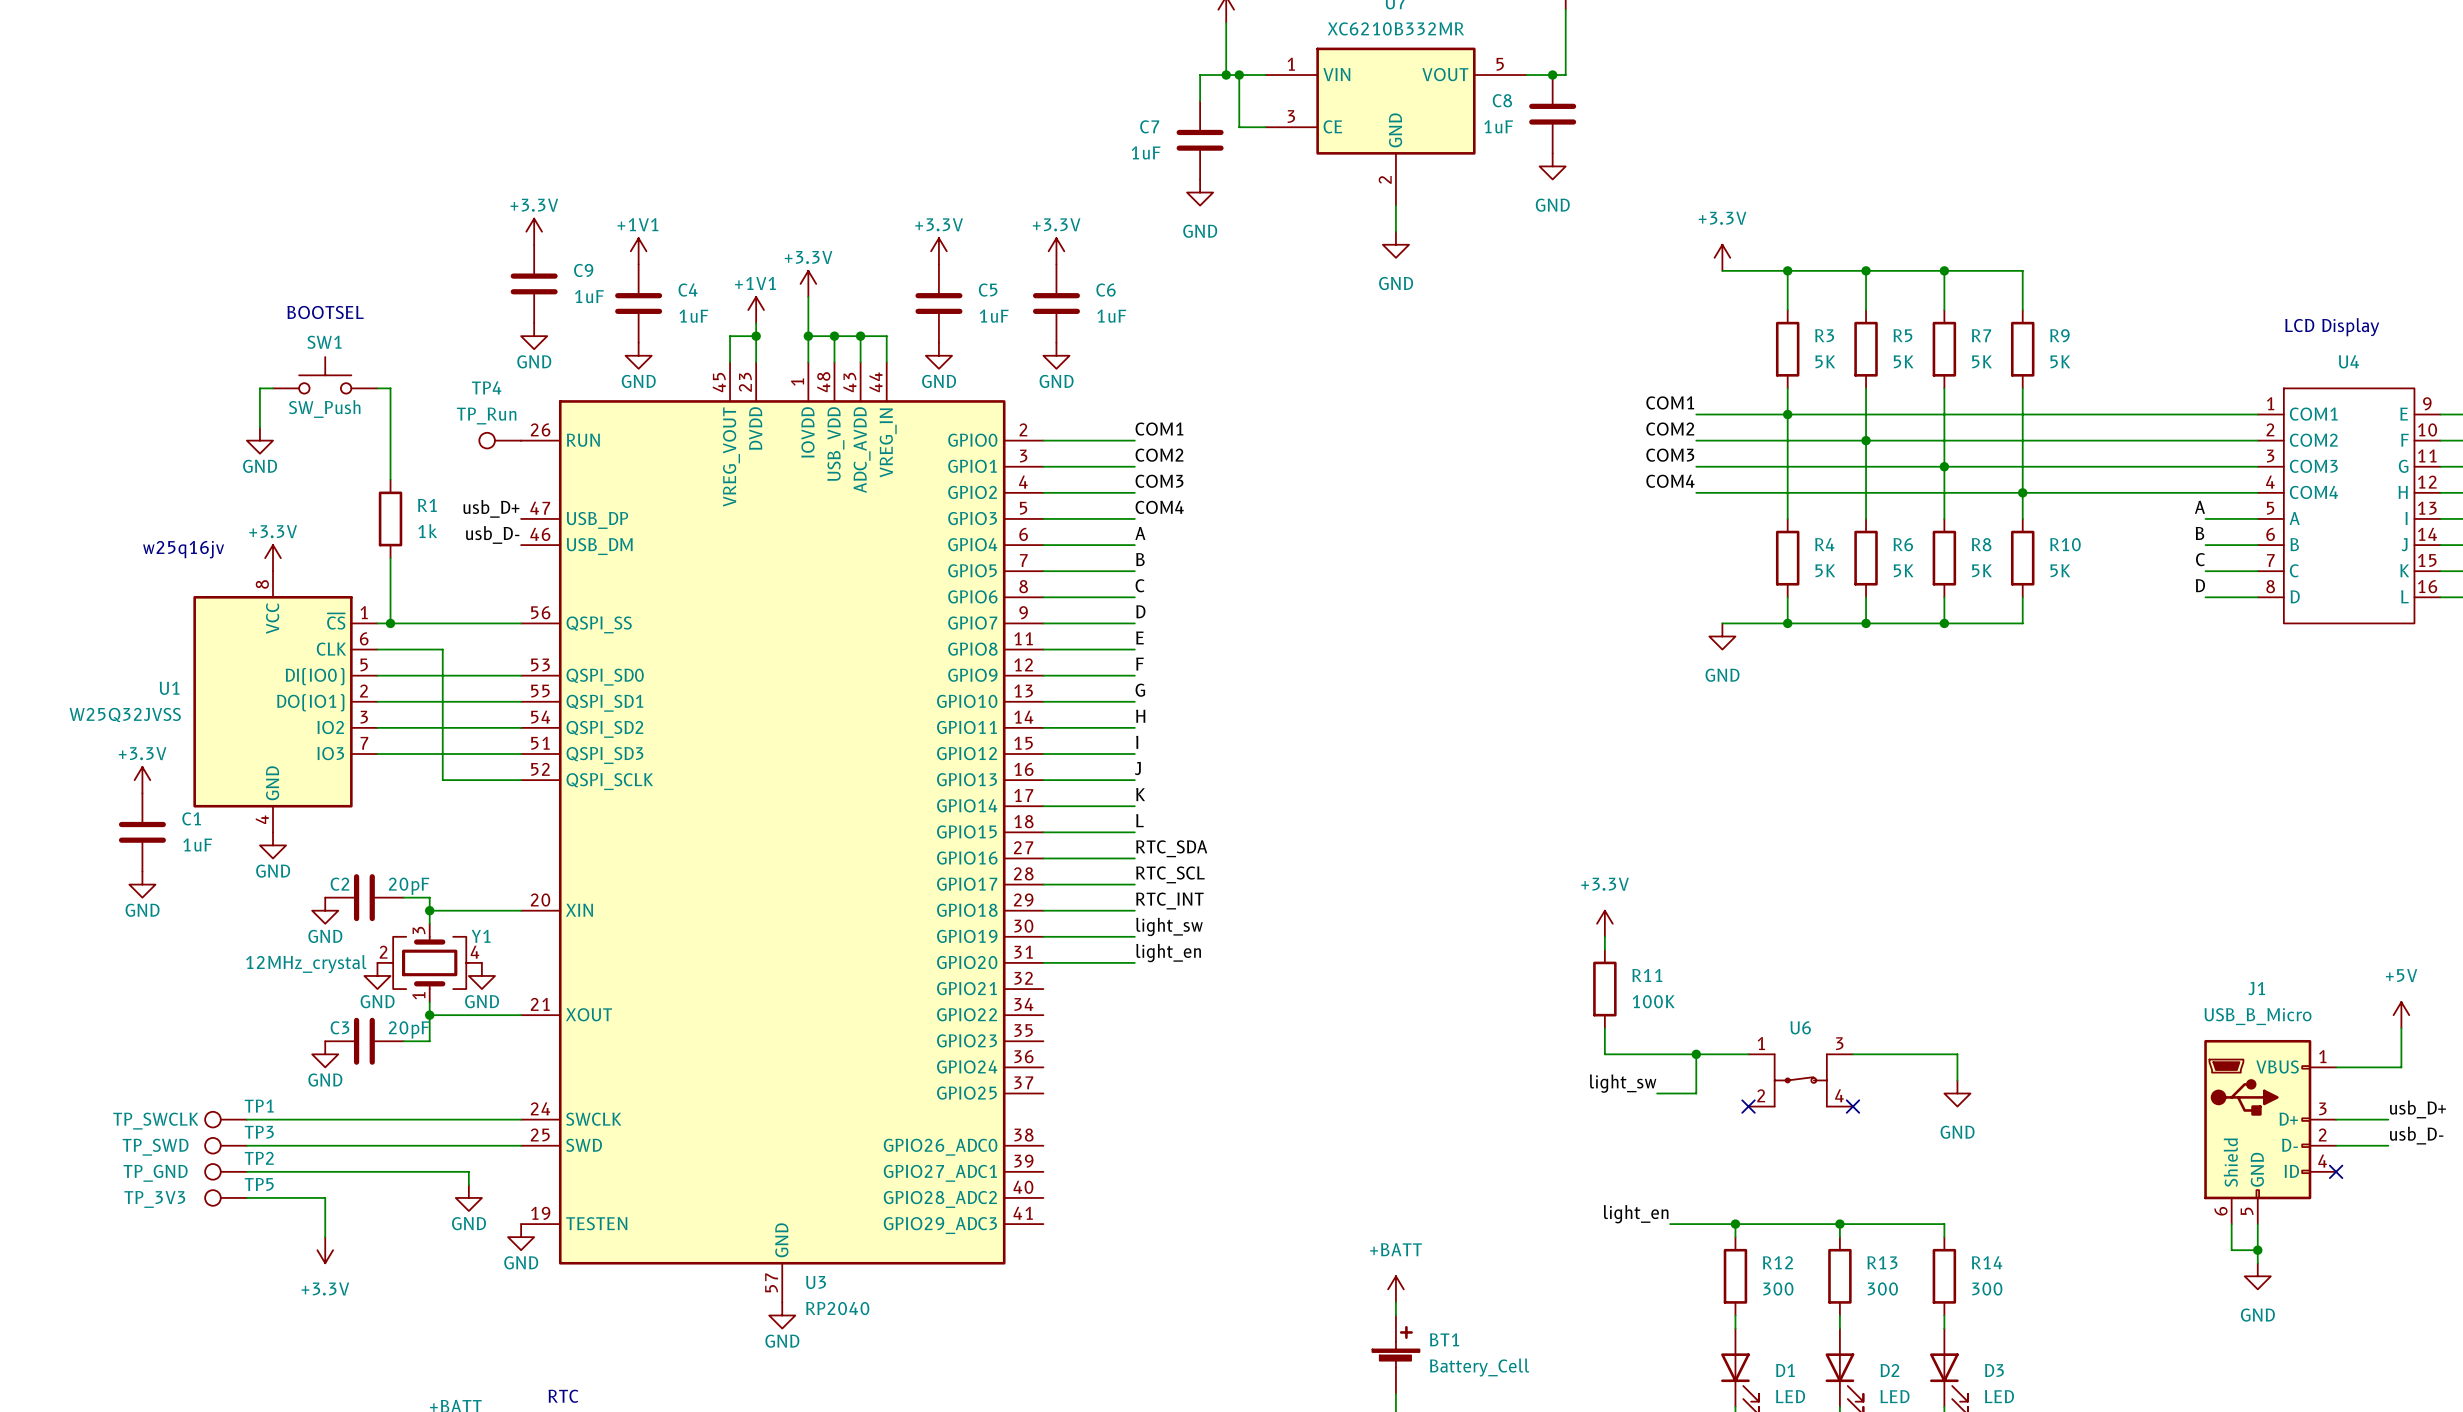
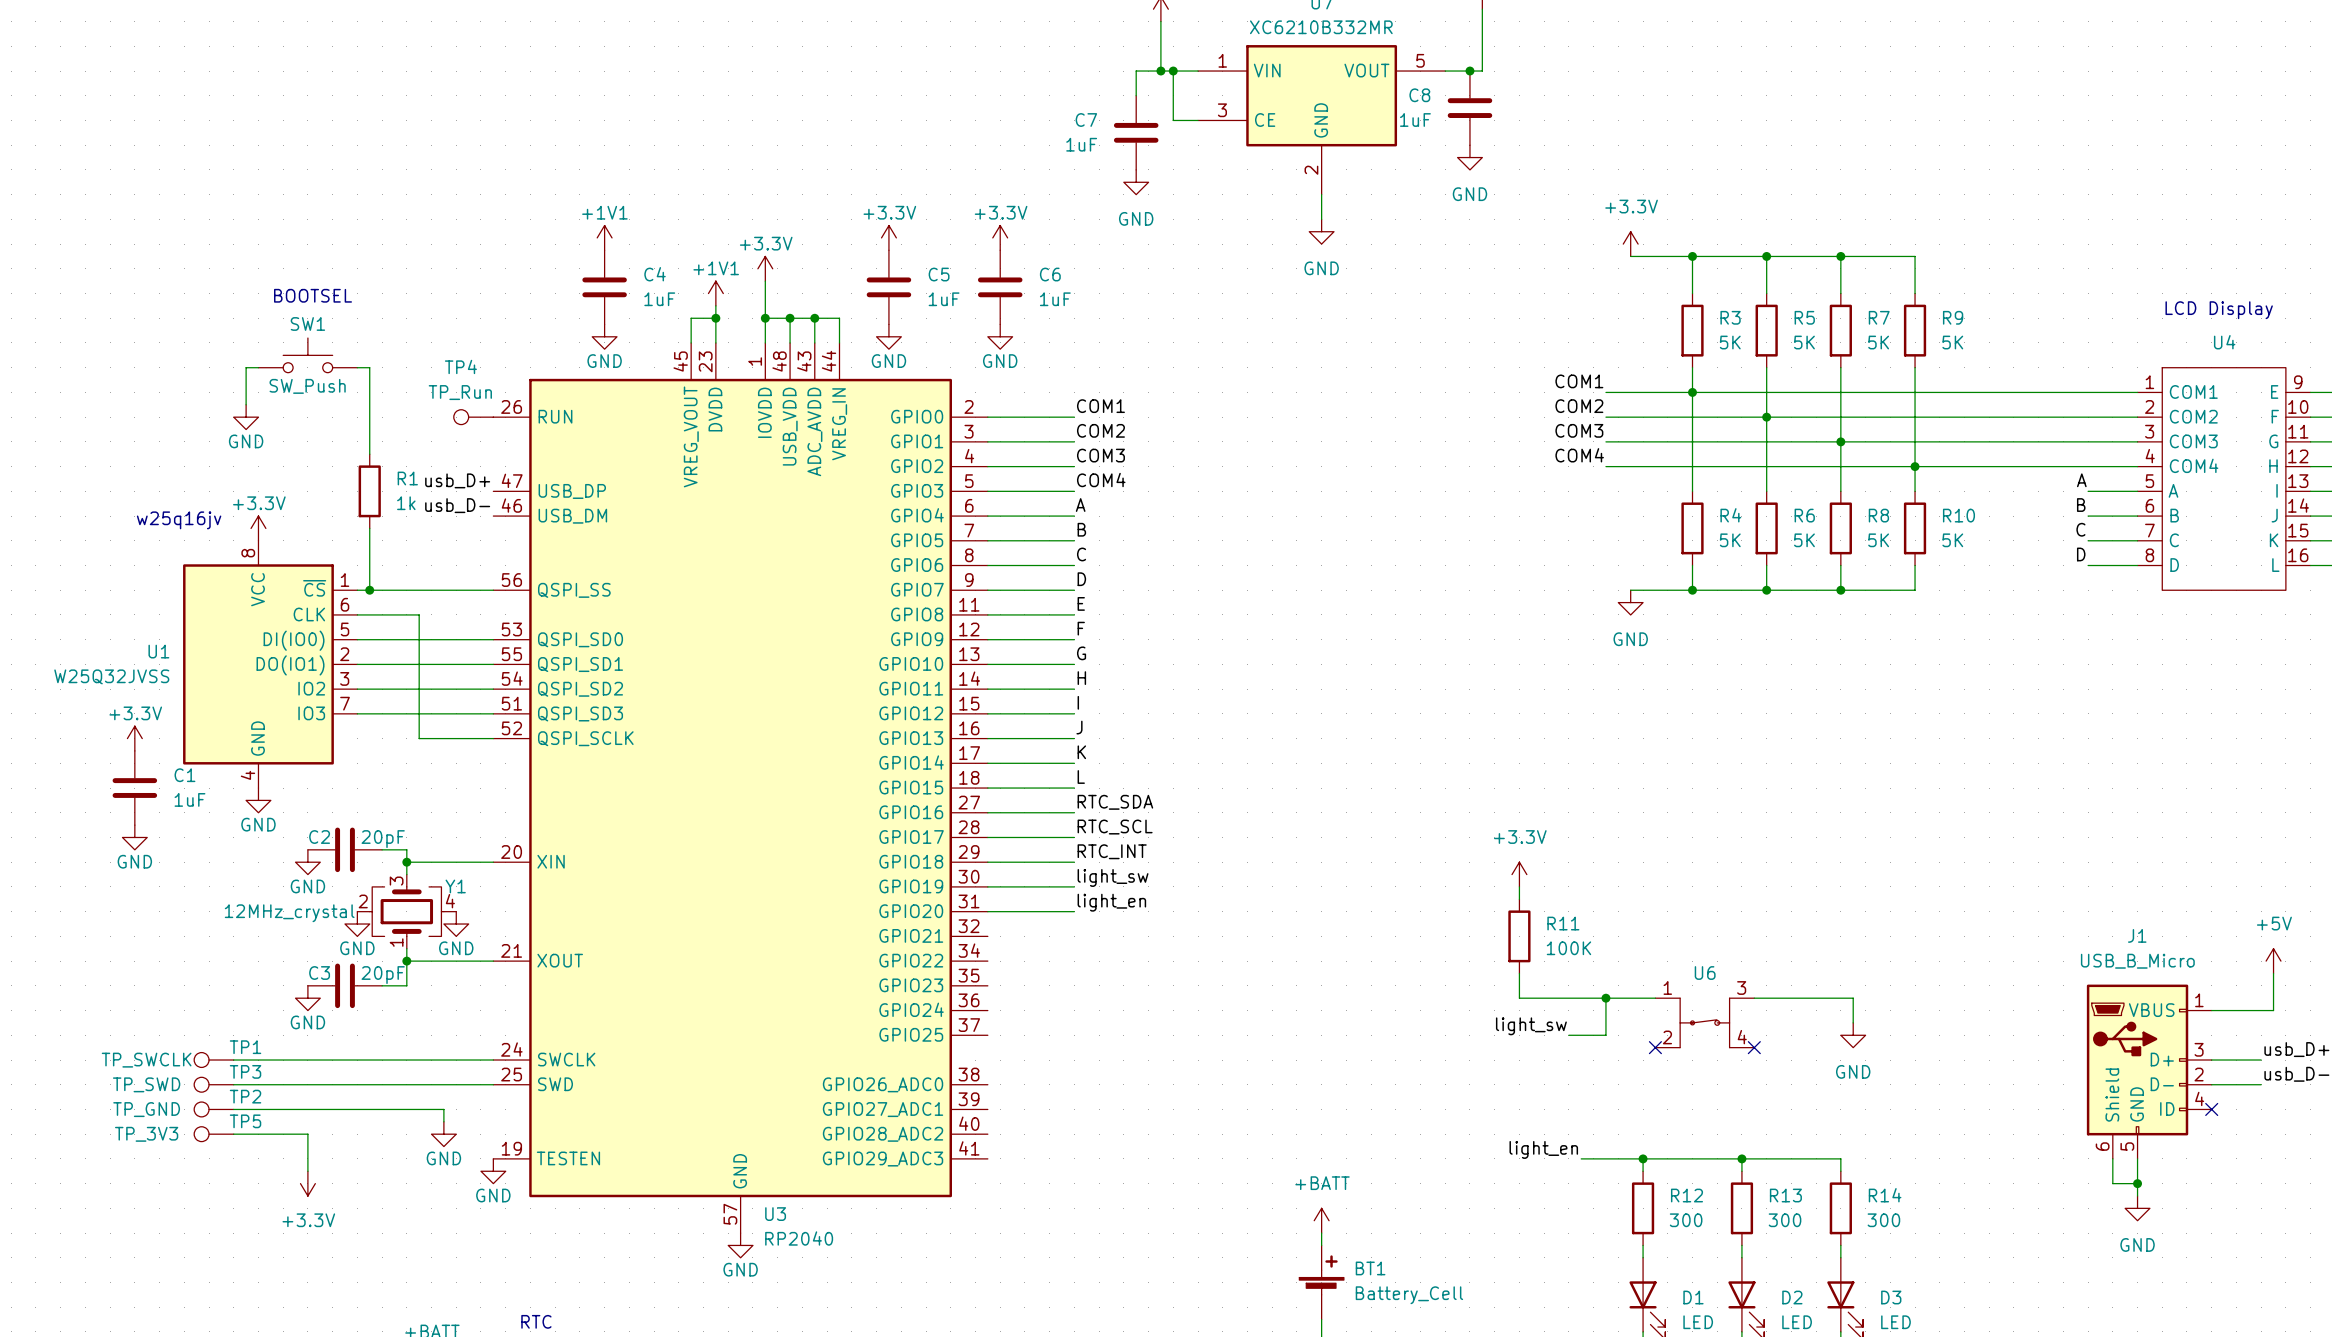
power symbol: +3.3V (534, 231) -> none
C9: 1uF (534, 283) -> none
power symbol: GND (534, 336) -> none

